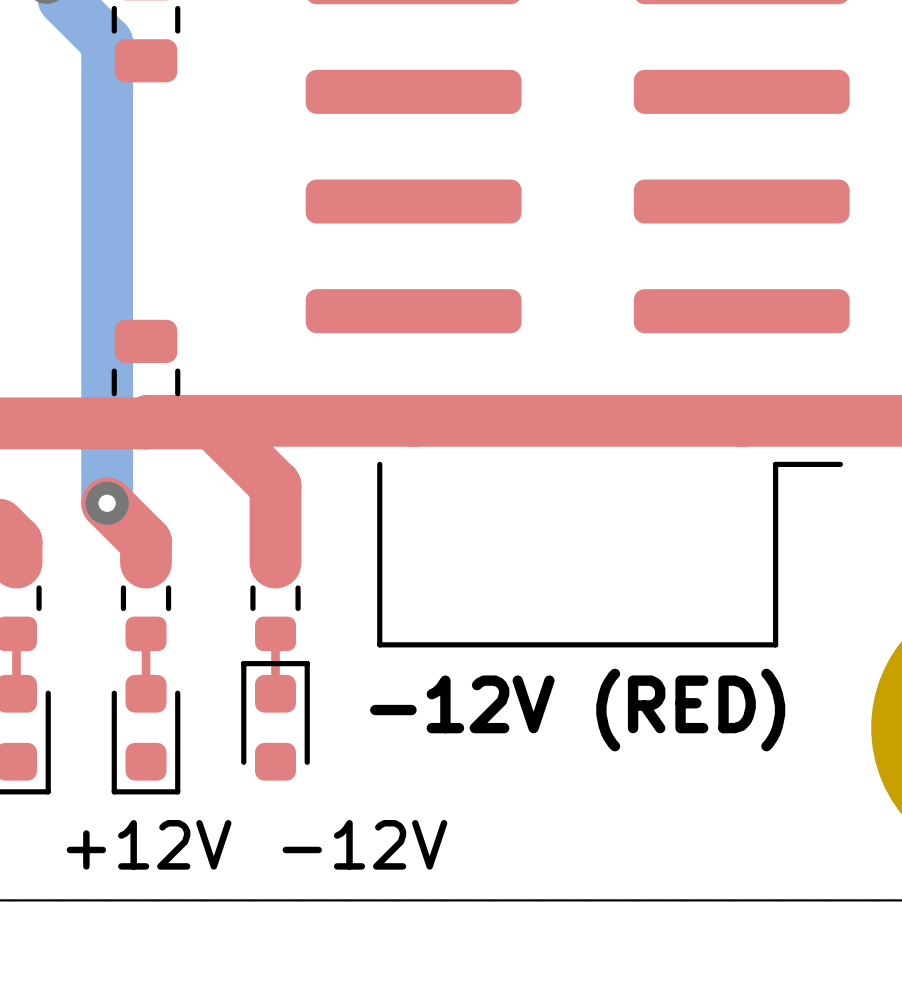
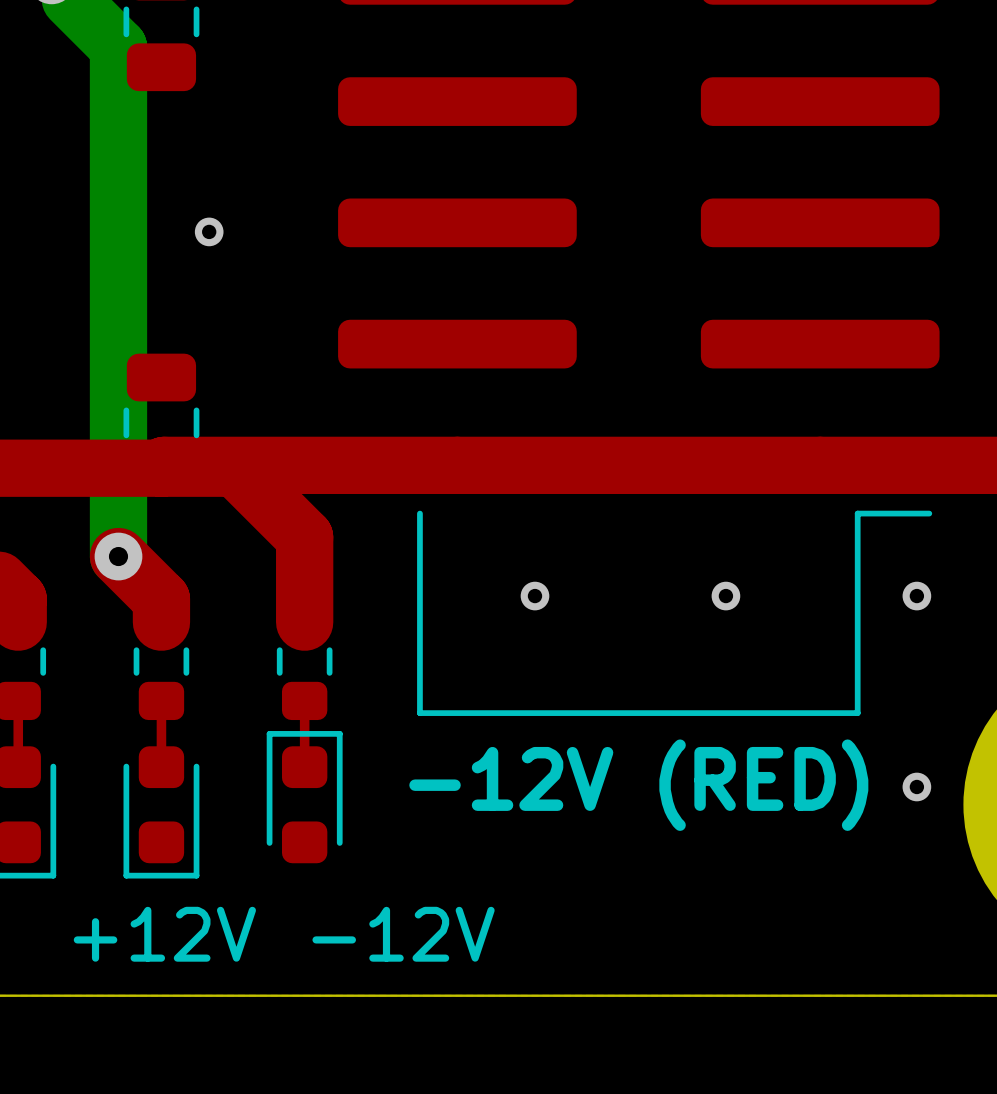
via: none -> (209, 231)
via: none -> (534, 596)
via: none -> (725, 596)
via: none -> (916, 596)
via: none -> (916, 786)

